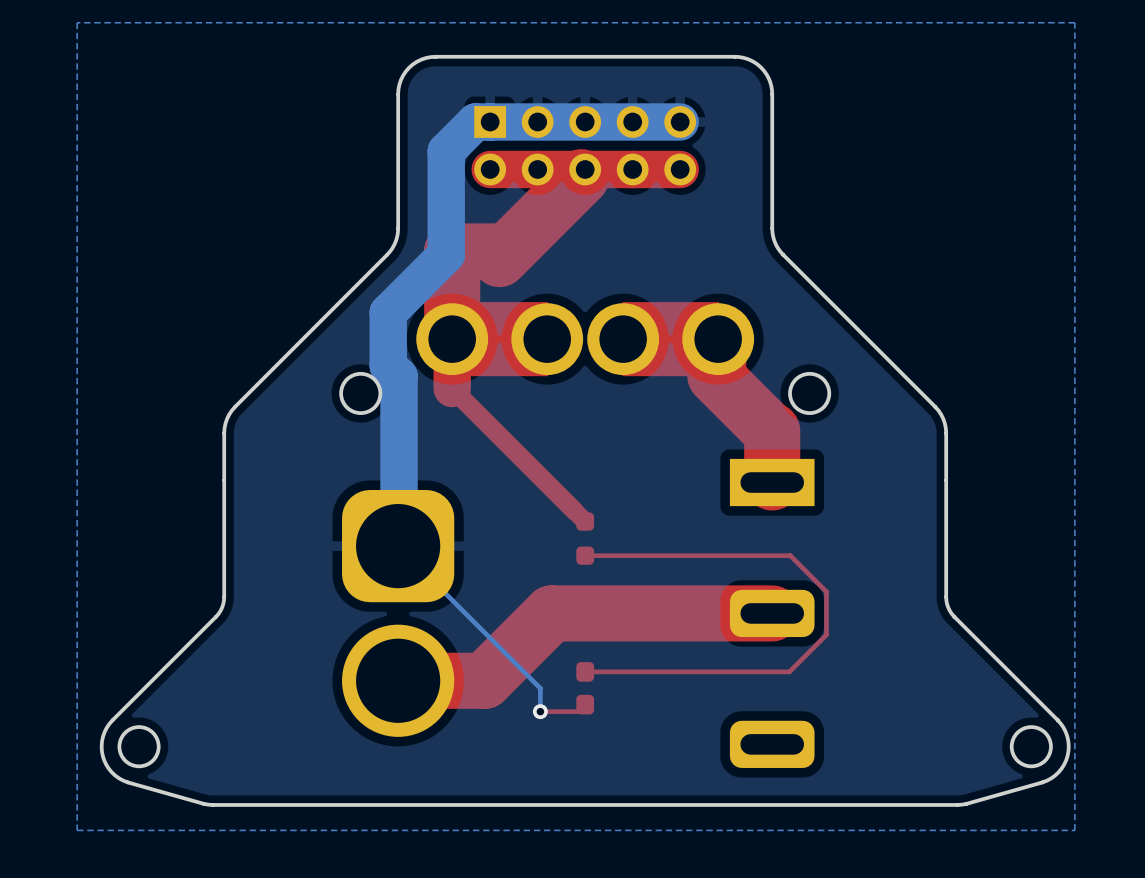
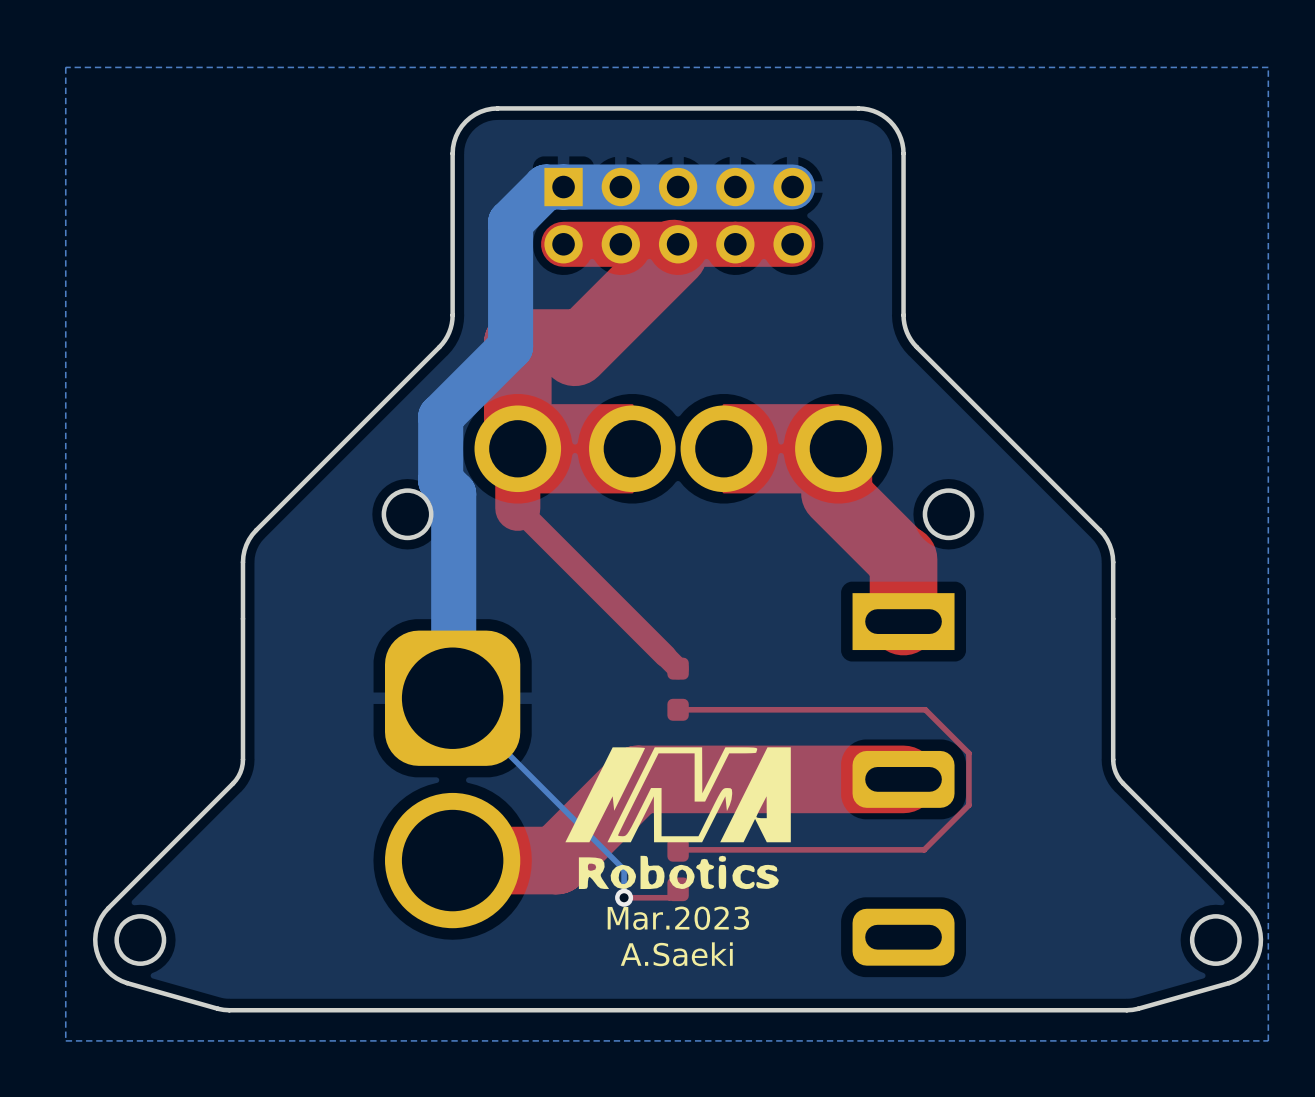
drawing: none -> [565, 747, 791, 890]
text: none -> Mar.2023 (678, 918)
text: none -> A.Saeki (676, 954)

